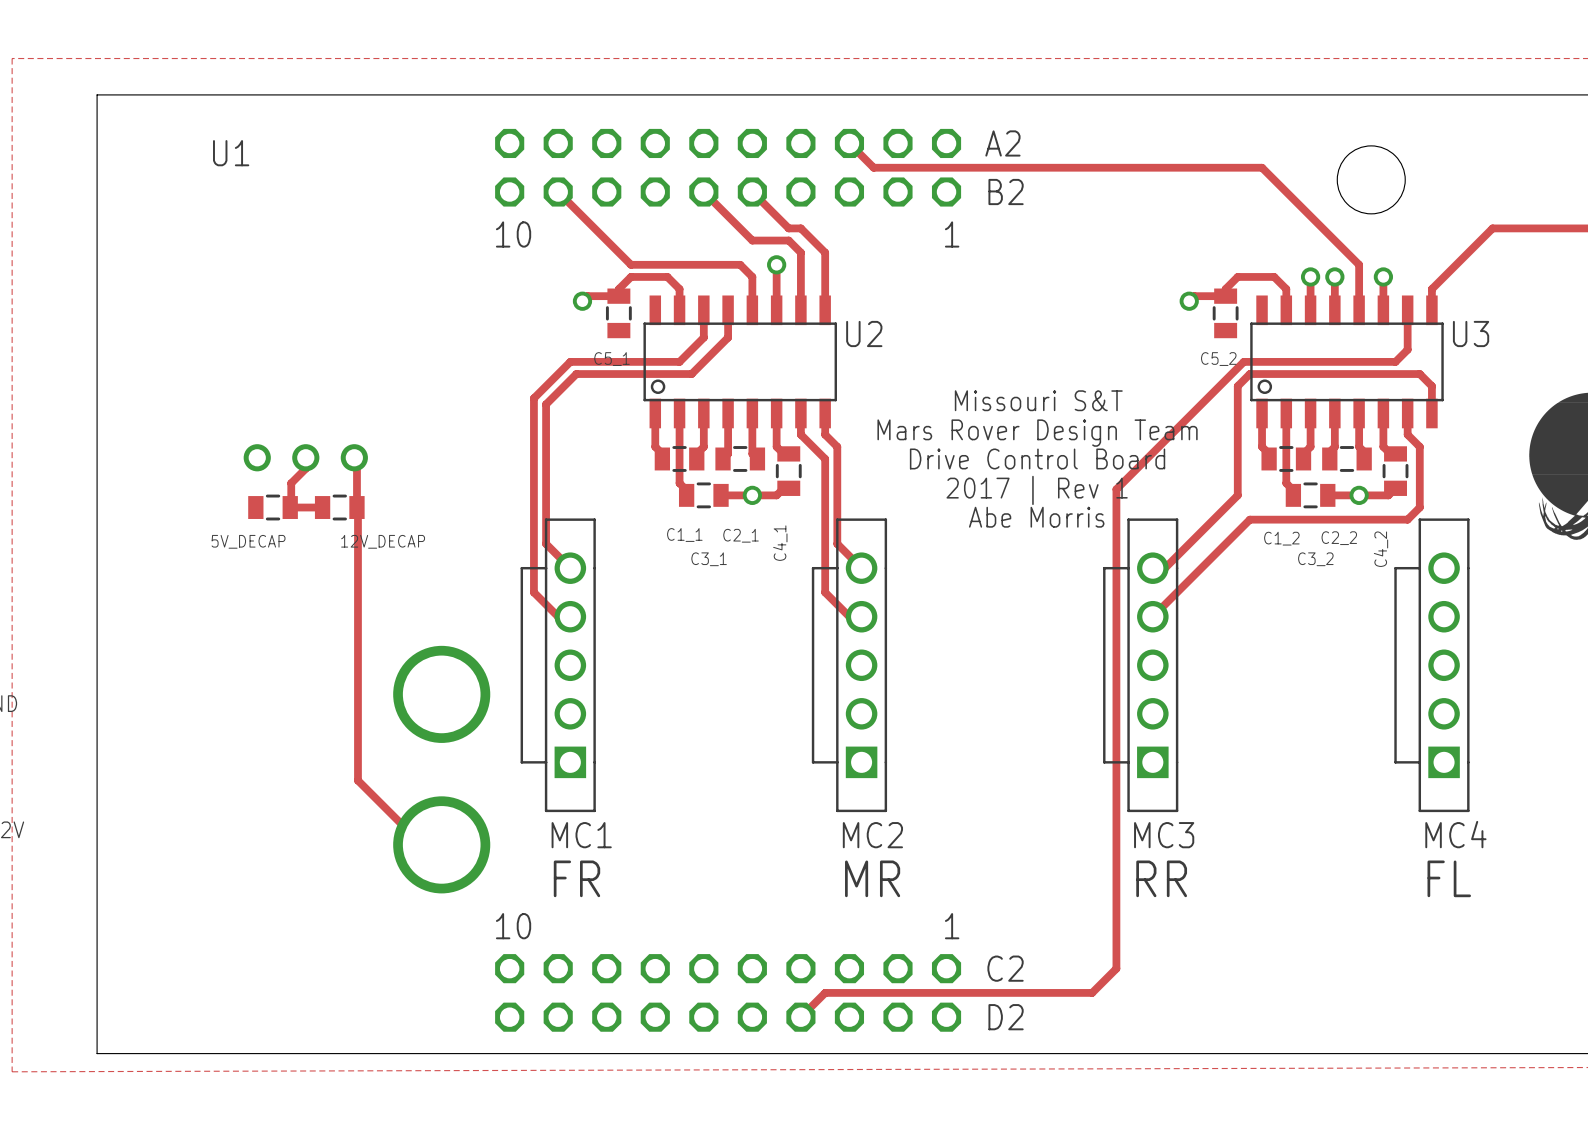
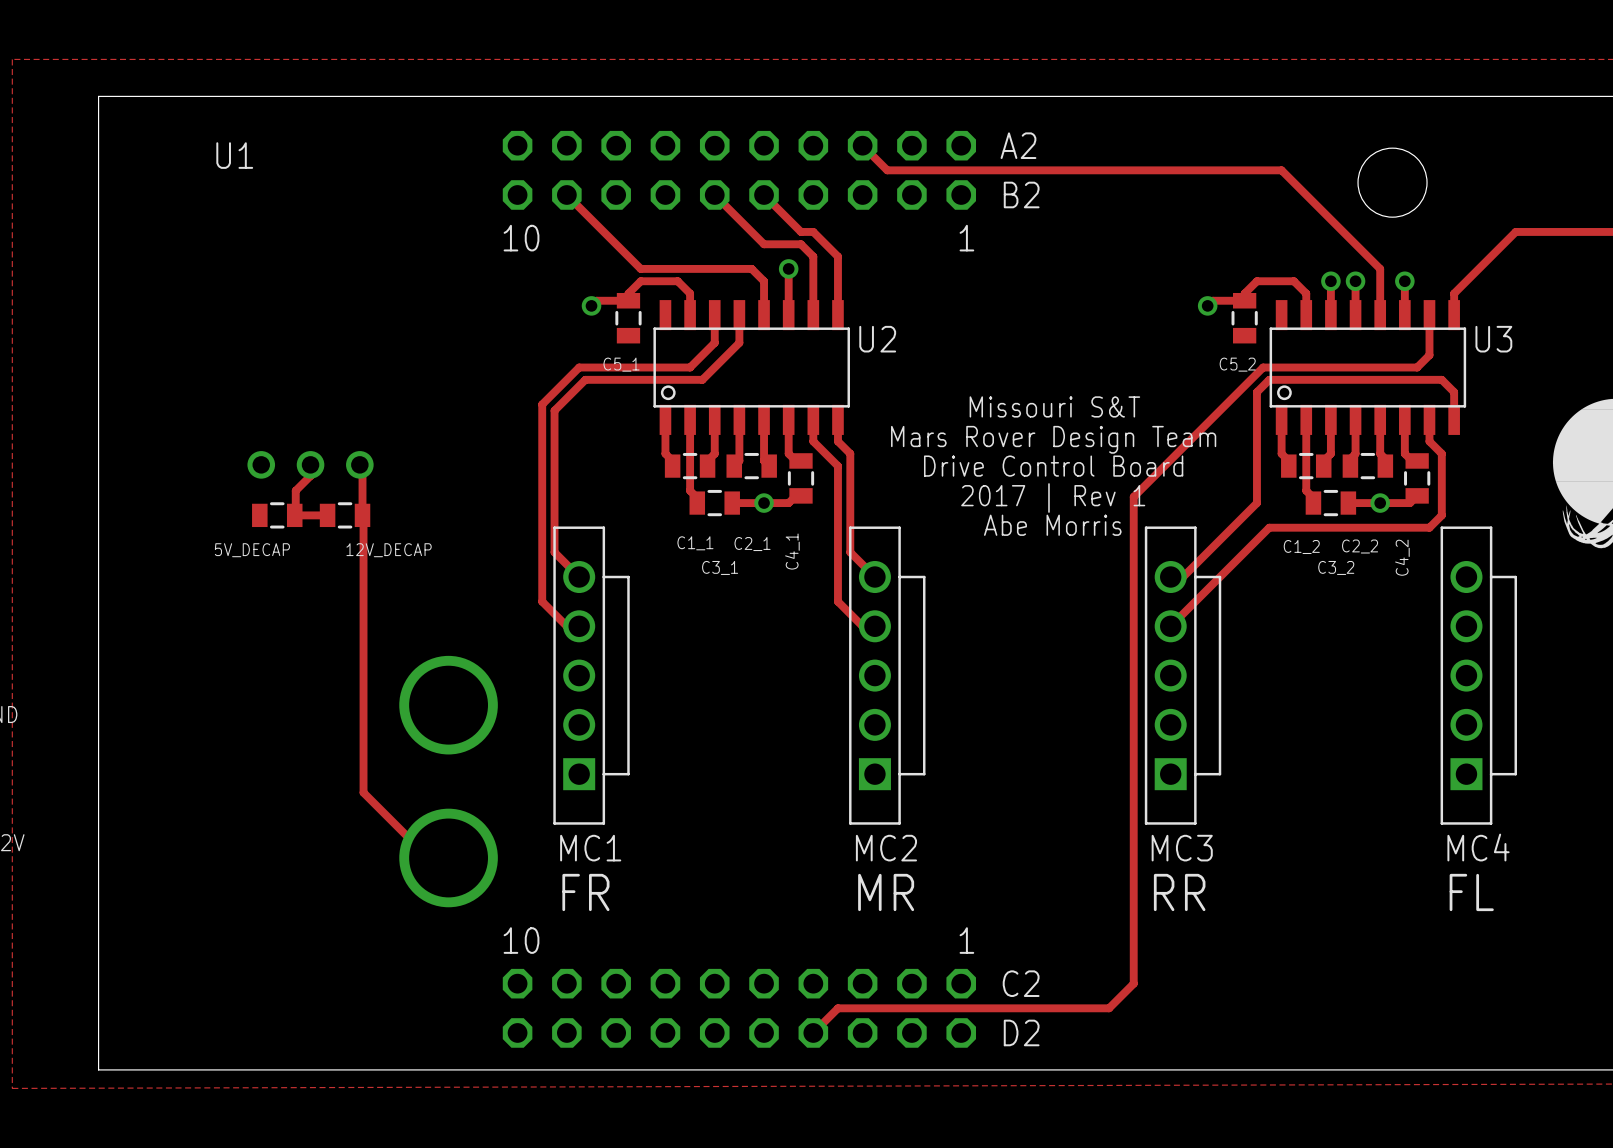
MC1 footprint: [520, 518, 596, 813] -> [553, 526, 630, 825]
MC2 footprint: [811, 518, 888, 813] -> [849, 526, 926, 825]
MC3 footprint: [1103, 518, 1179, 813] -> [1144, 526, 1222, 825]
MC4 footprint: [1394, 518, 1470, 813] -> [1440, 526, 1517, 825]

